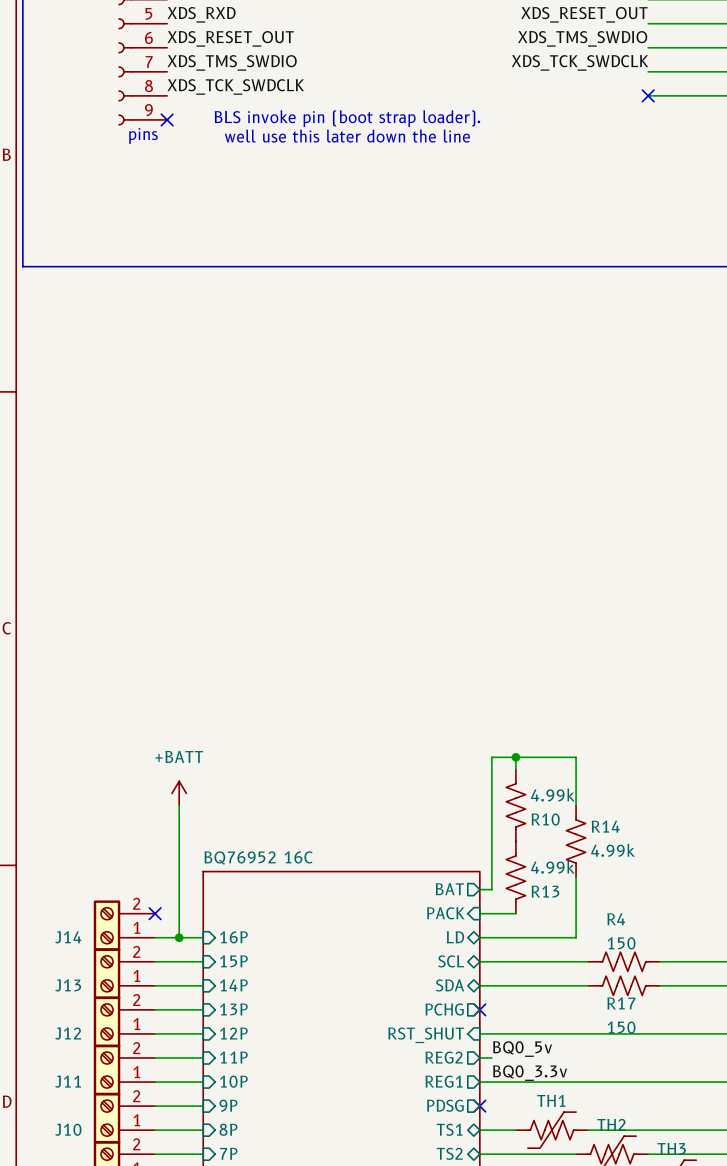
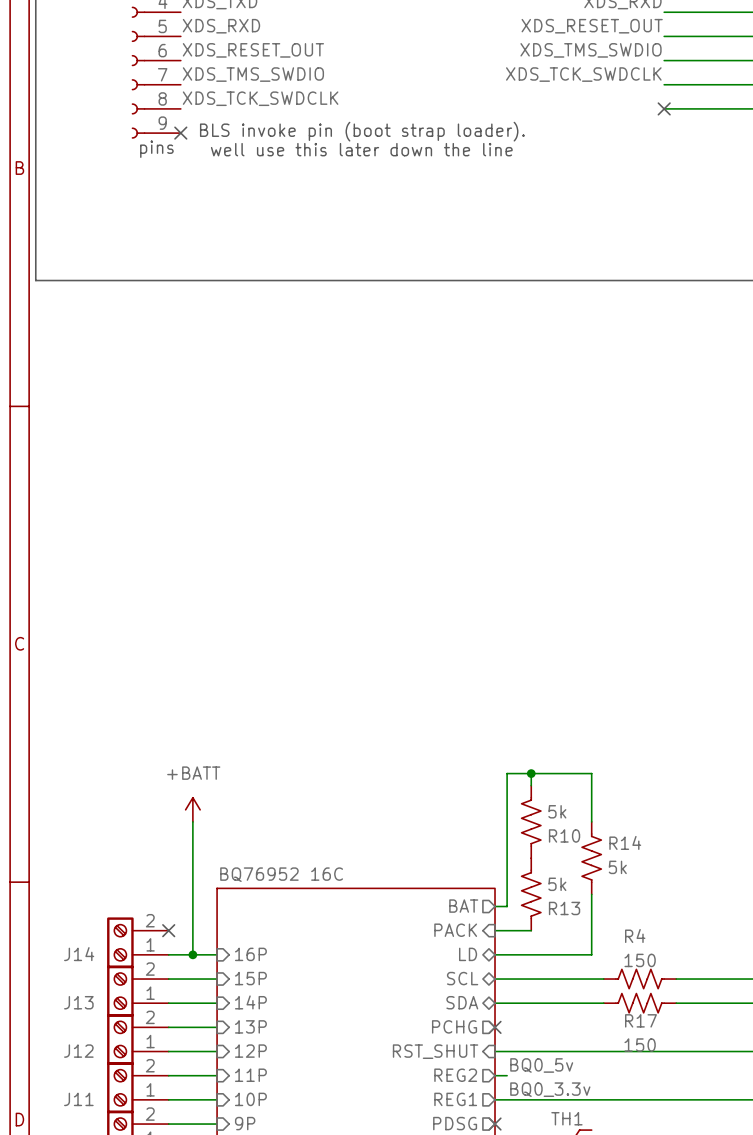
R10 value: 4.99k (552, 795) -> 5k (557, 811)
R14 value: 4.99k (613, 850) -> 5k (617, 867)
R13 value: 4.99k (552, 867) -> 5k (557, 884)

